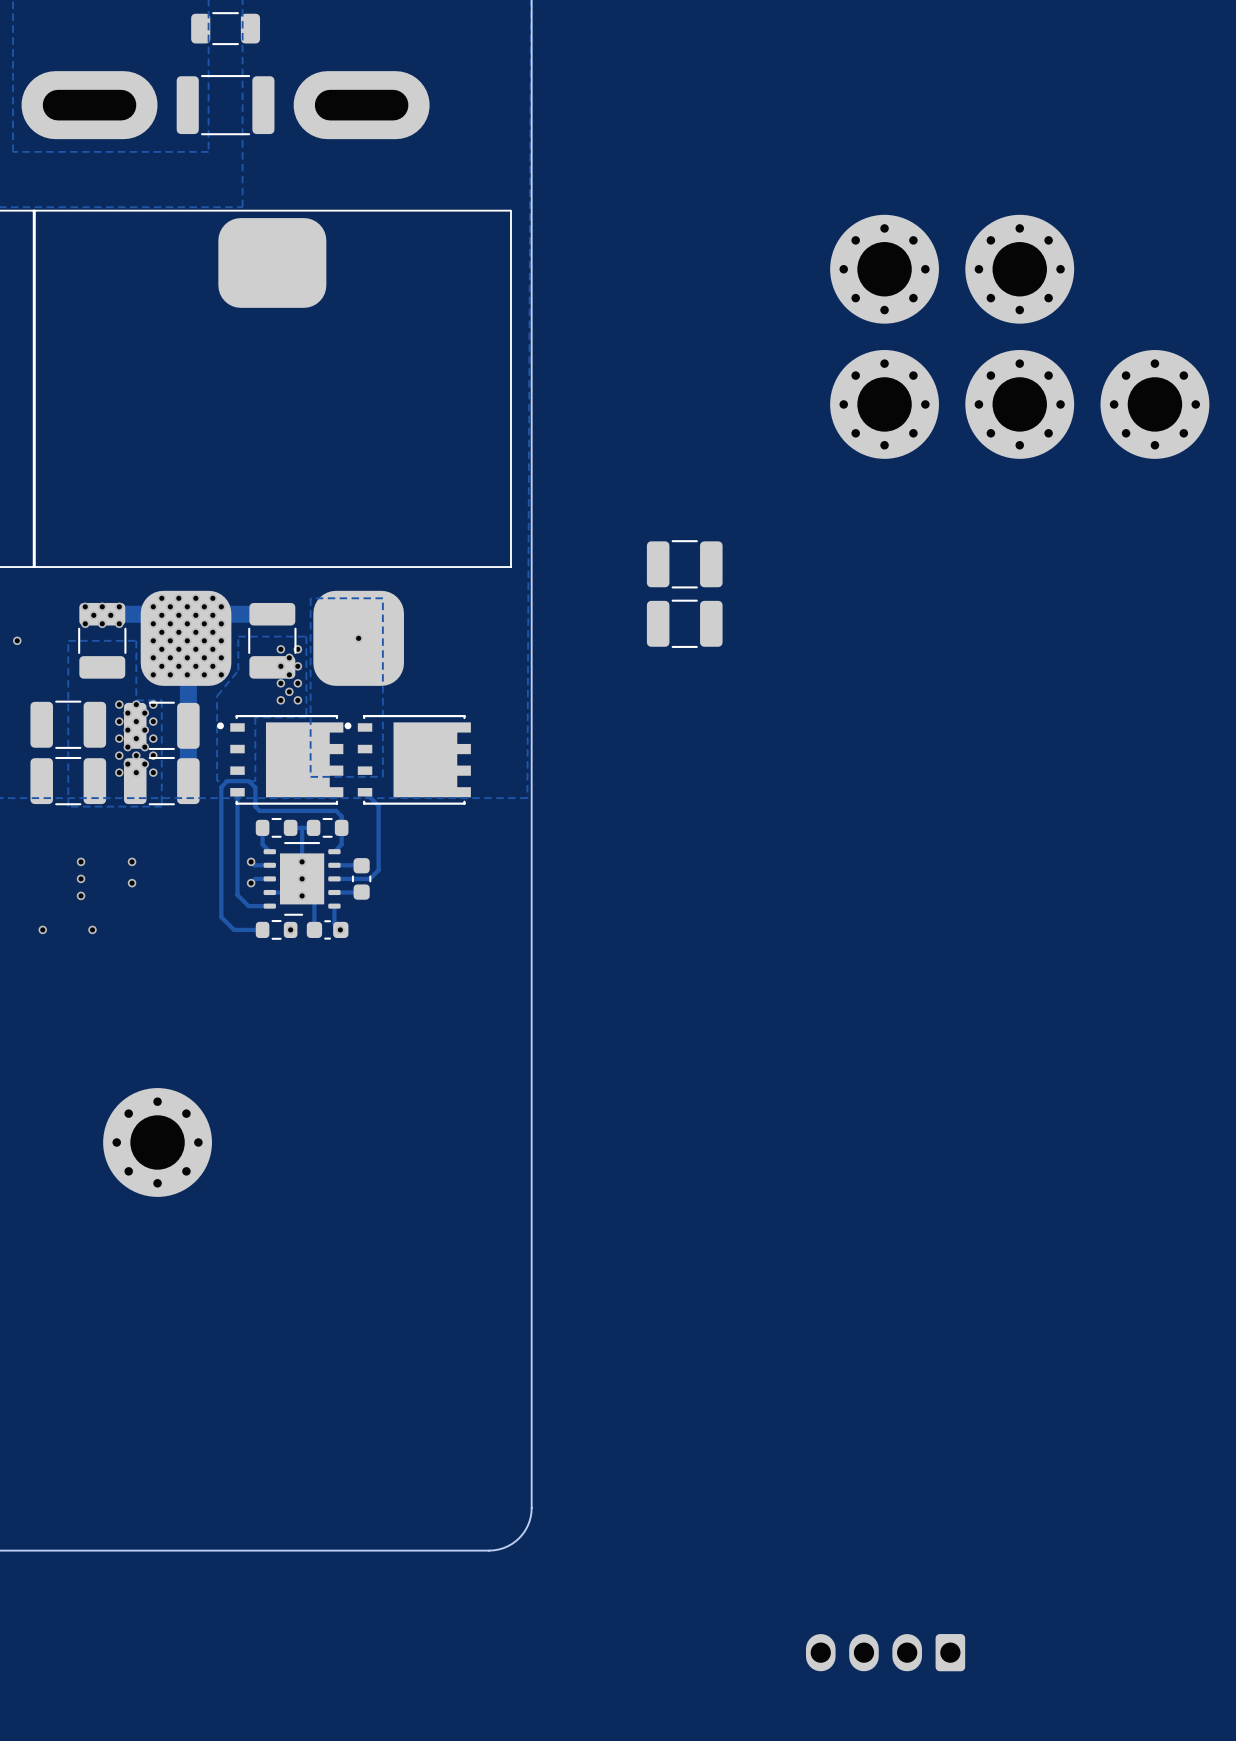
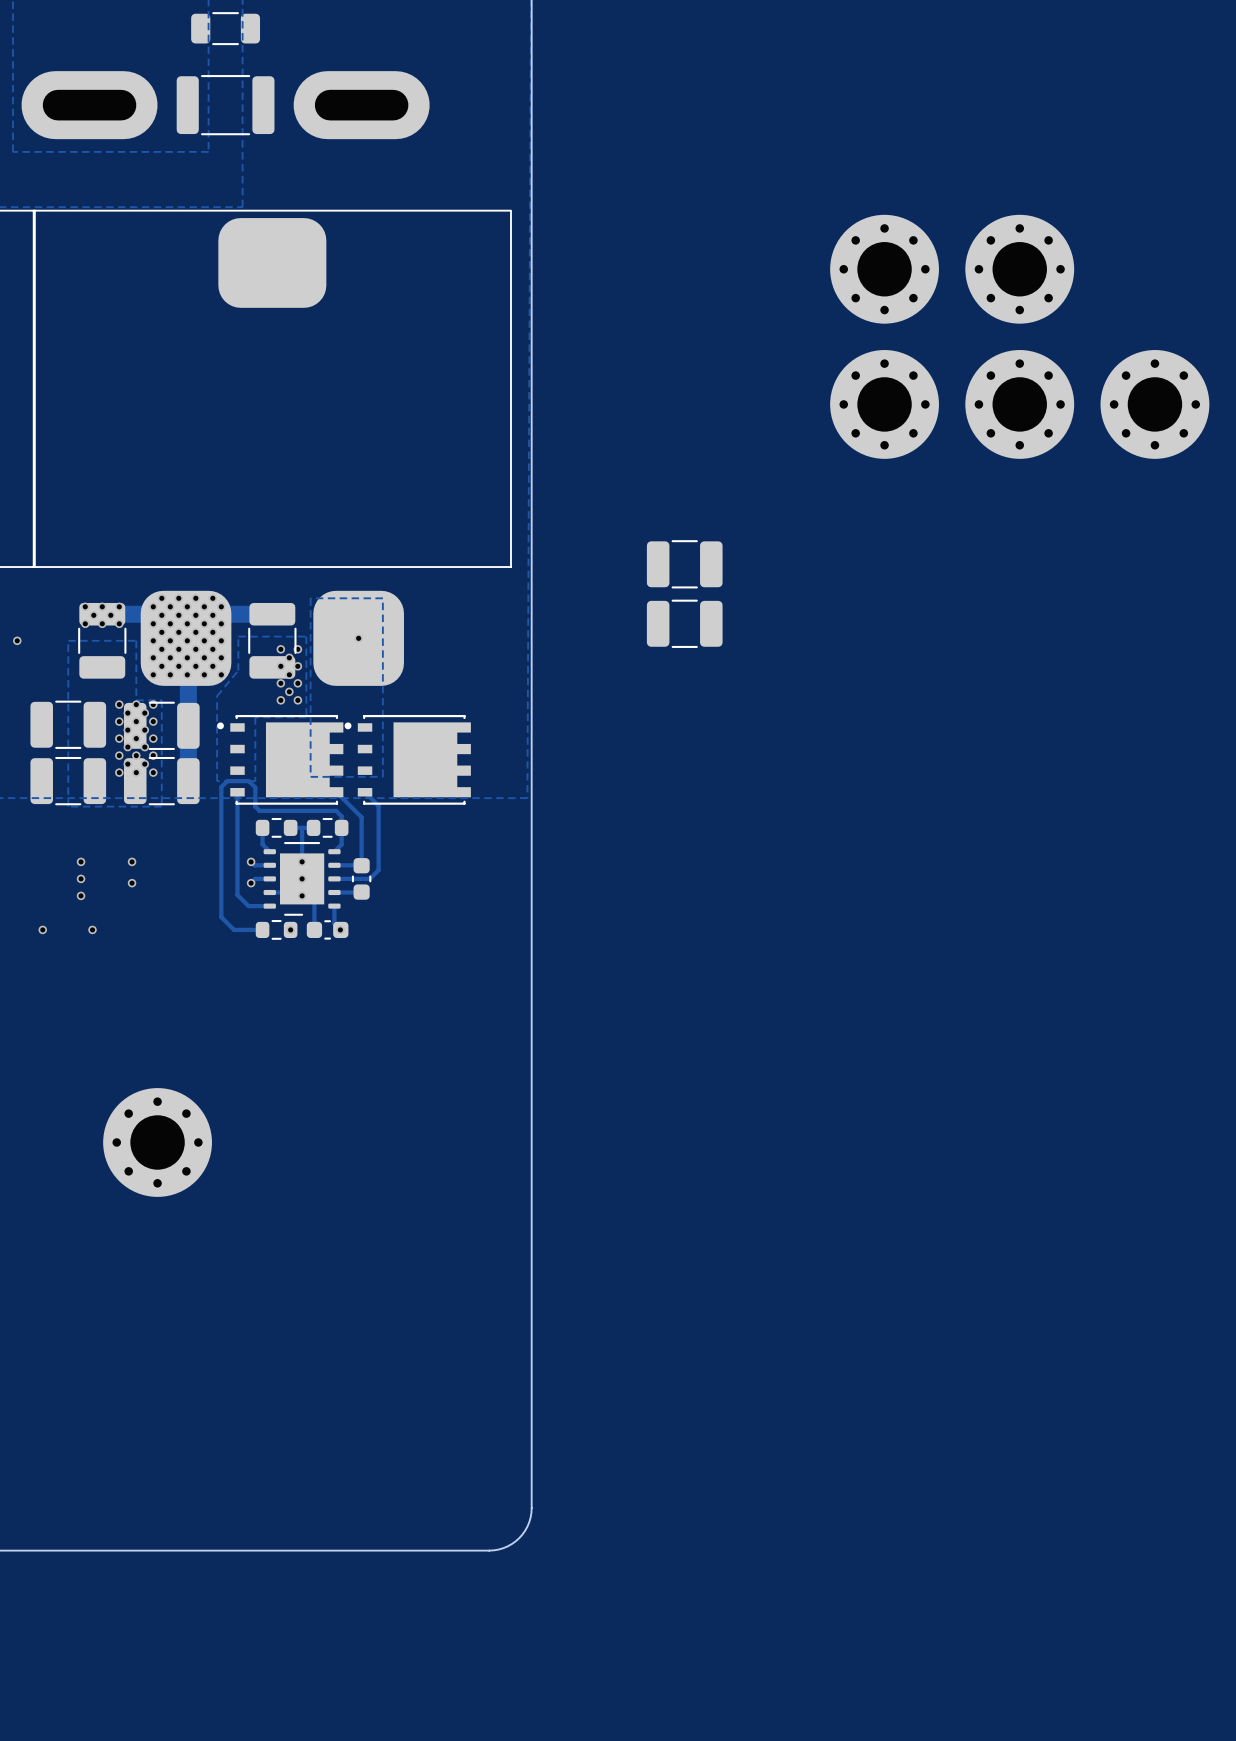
track: none -> (336, 792) (361, 817) (361, 865)
part: (885, 1652) -> none

